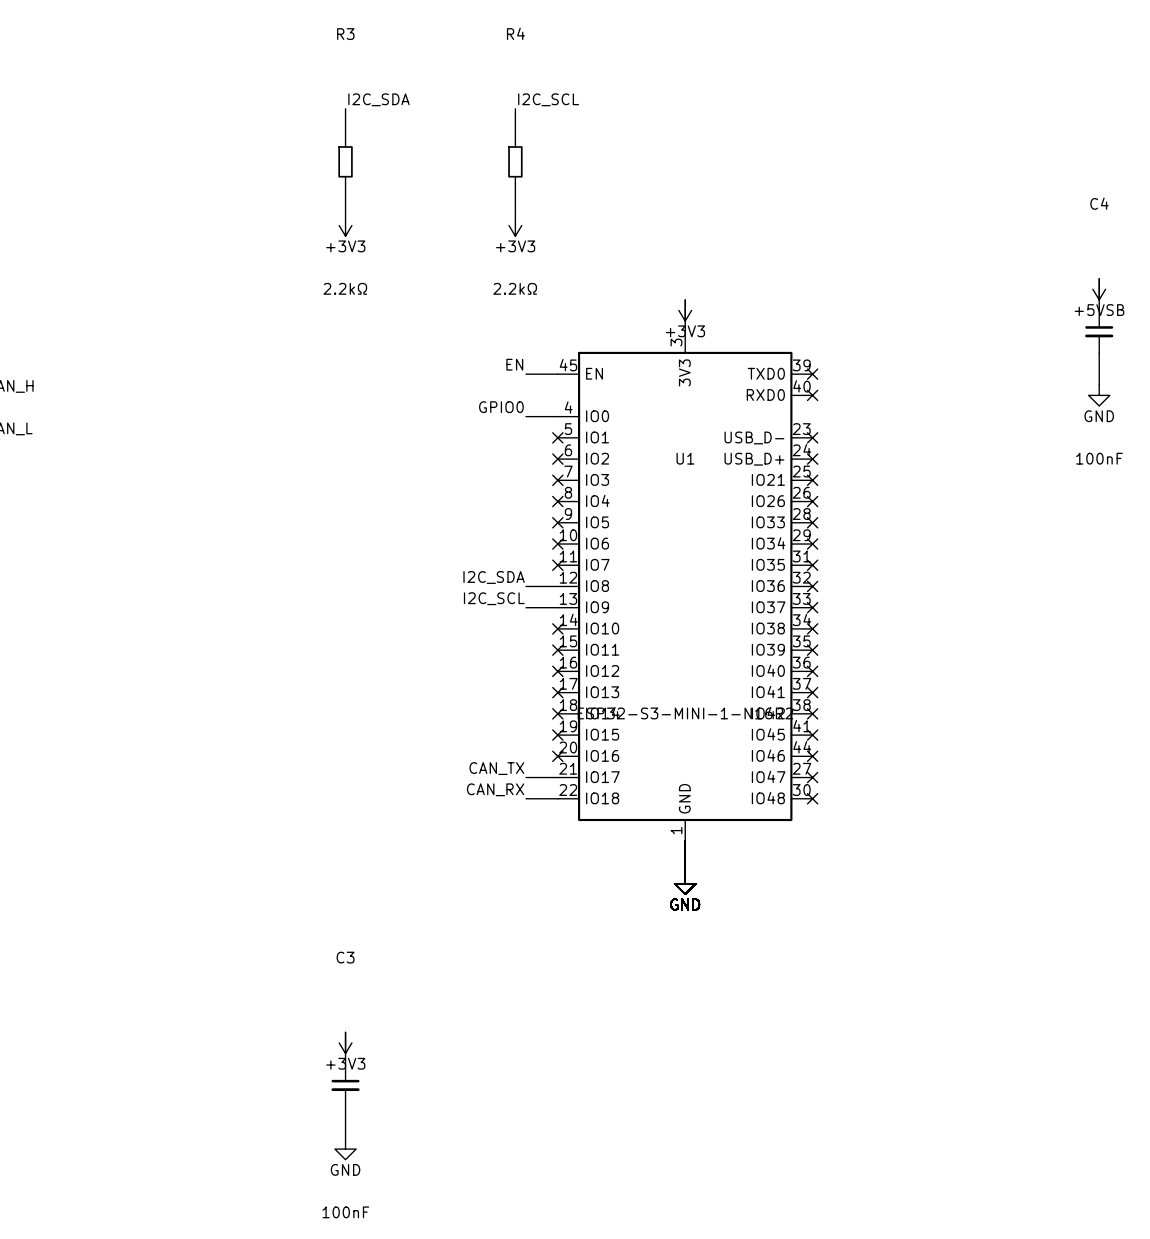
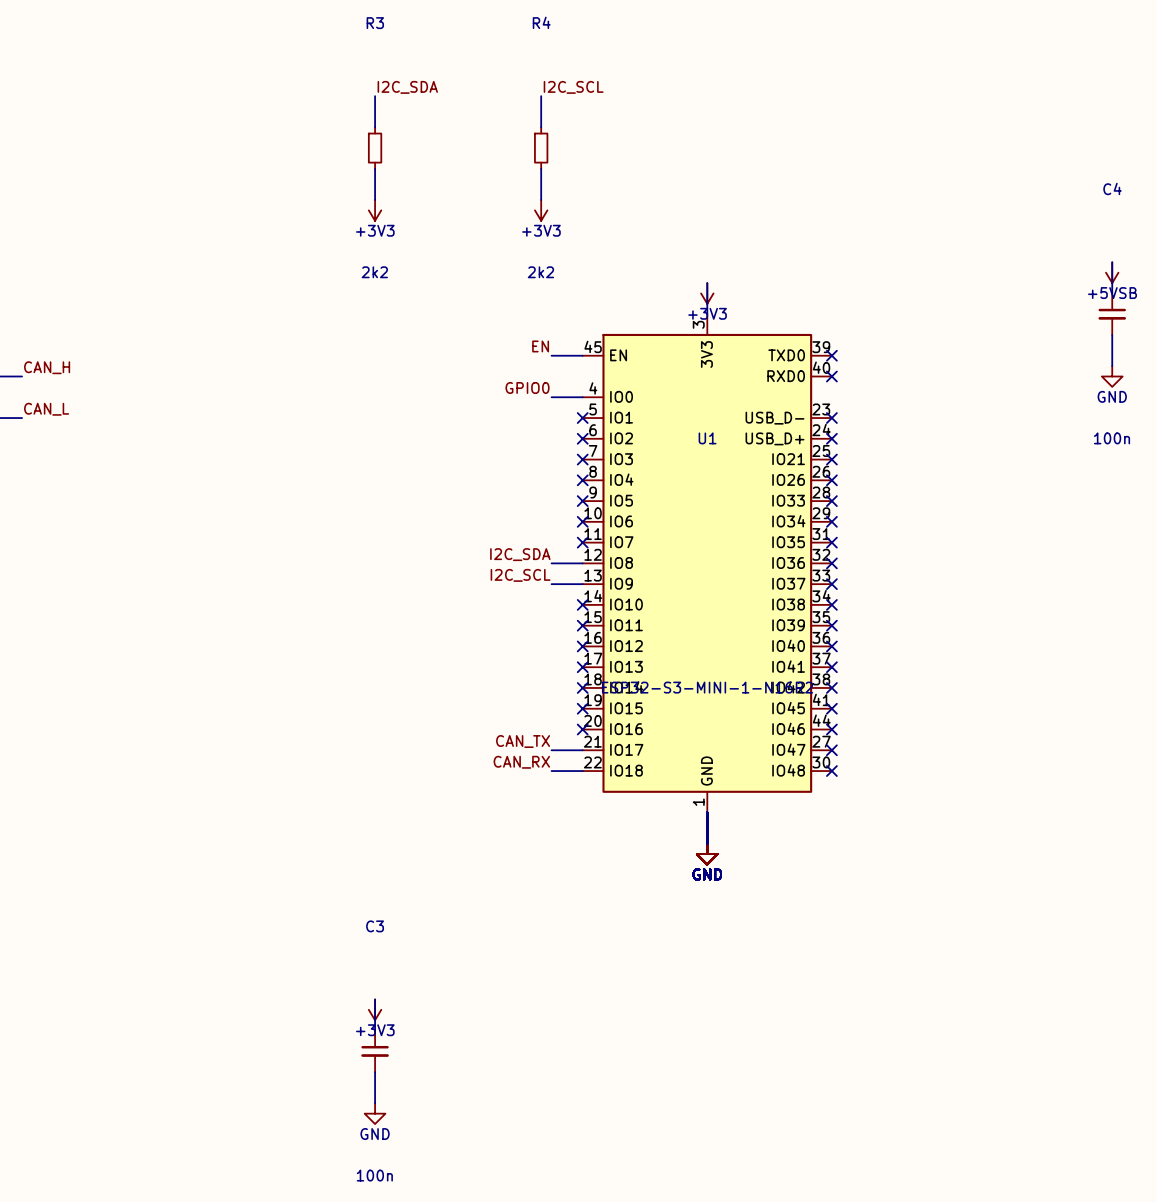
R3 value: 2.2kΩ (345, 288) -> 2k2 (374, 272)
R4 value: 2.2kΩ (515, 288) -> 2k2 (540, 272)
C4 value: 100nF (1099, 458) -> 100n (1111, 438)
C3 value: 100nF (345, 1212) -> 100n (374, 1175)

